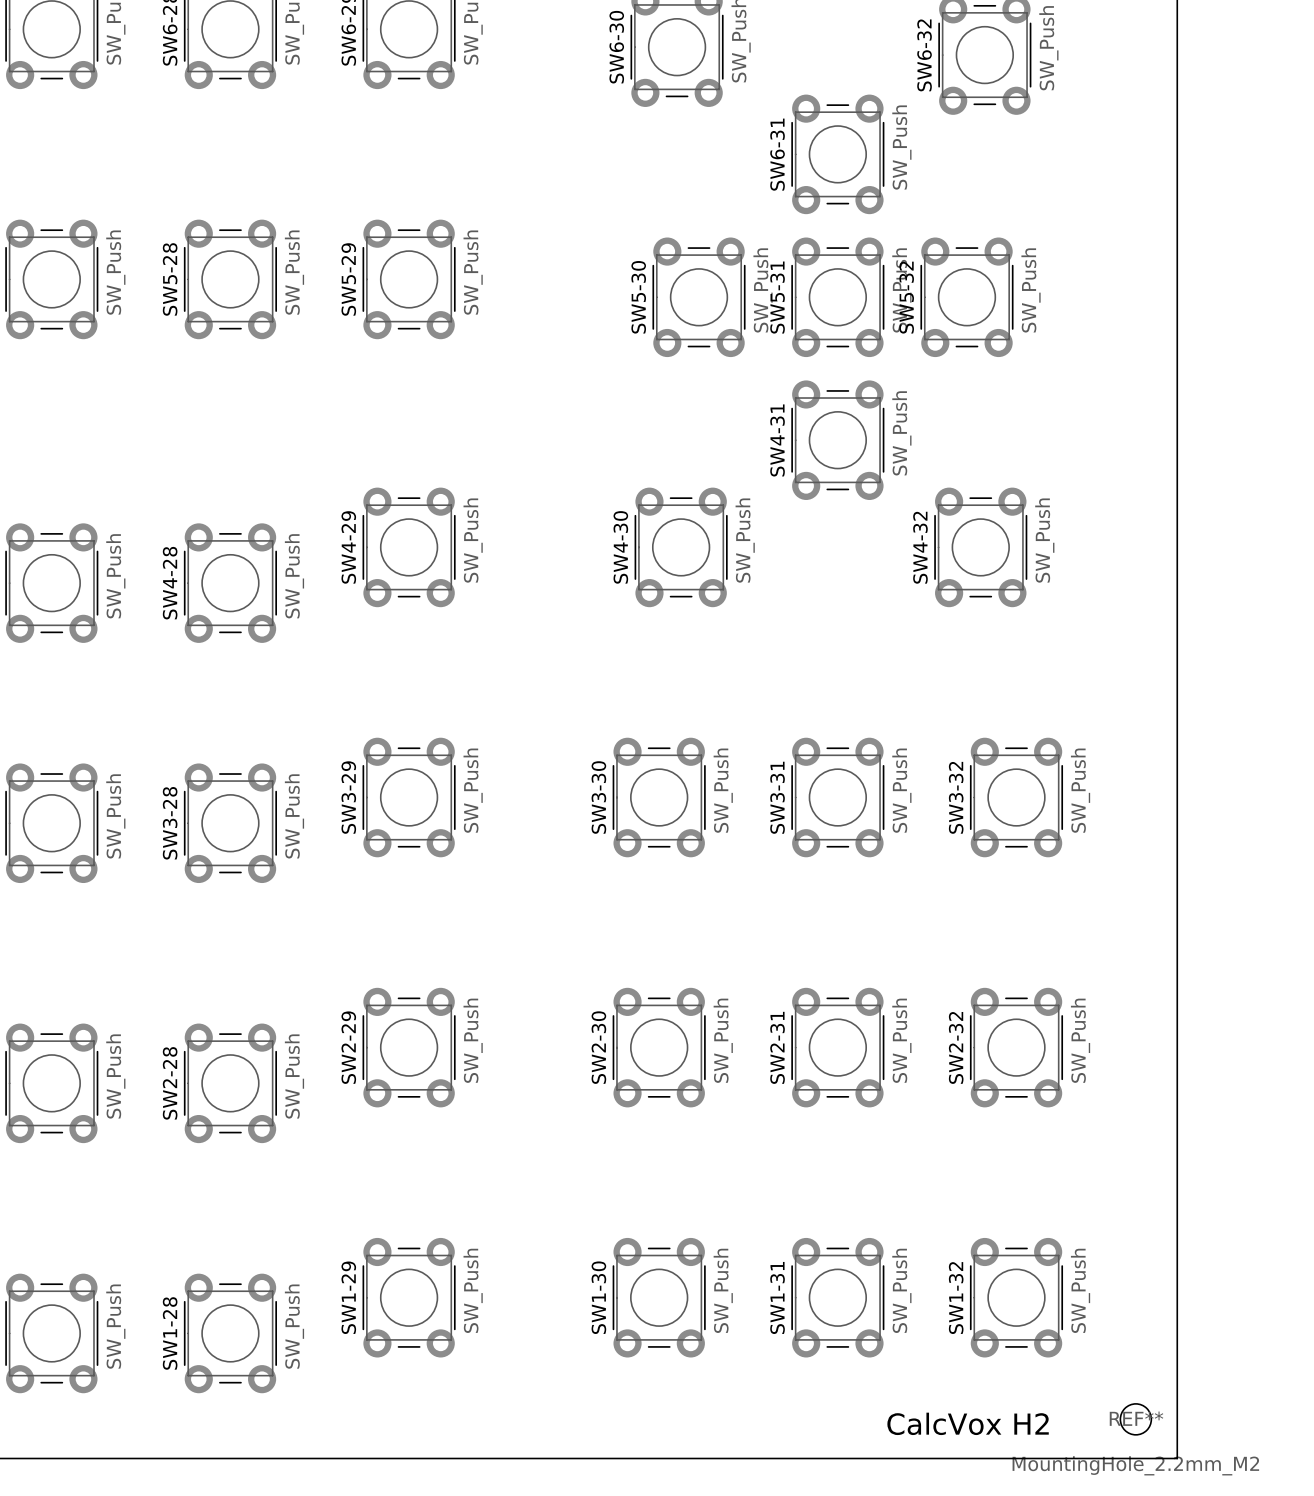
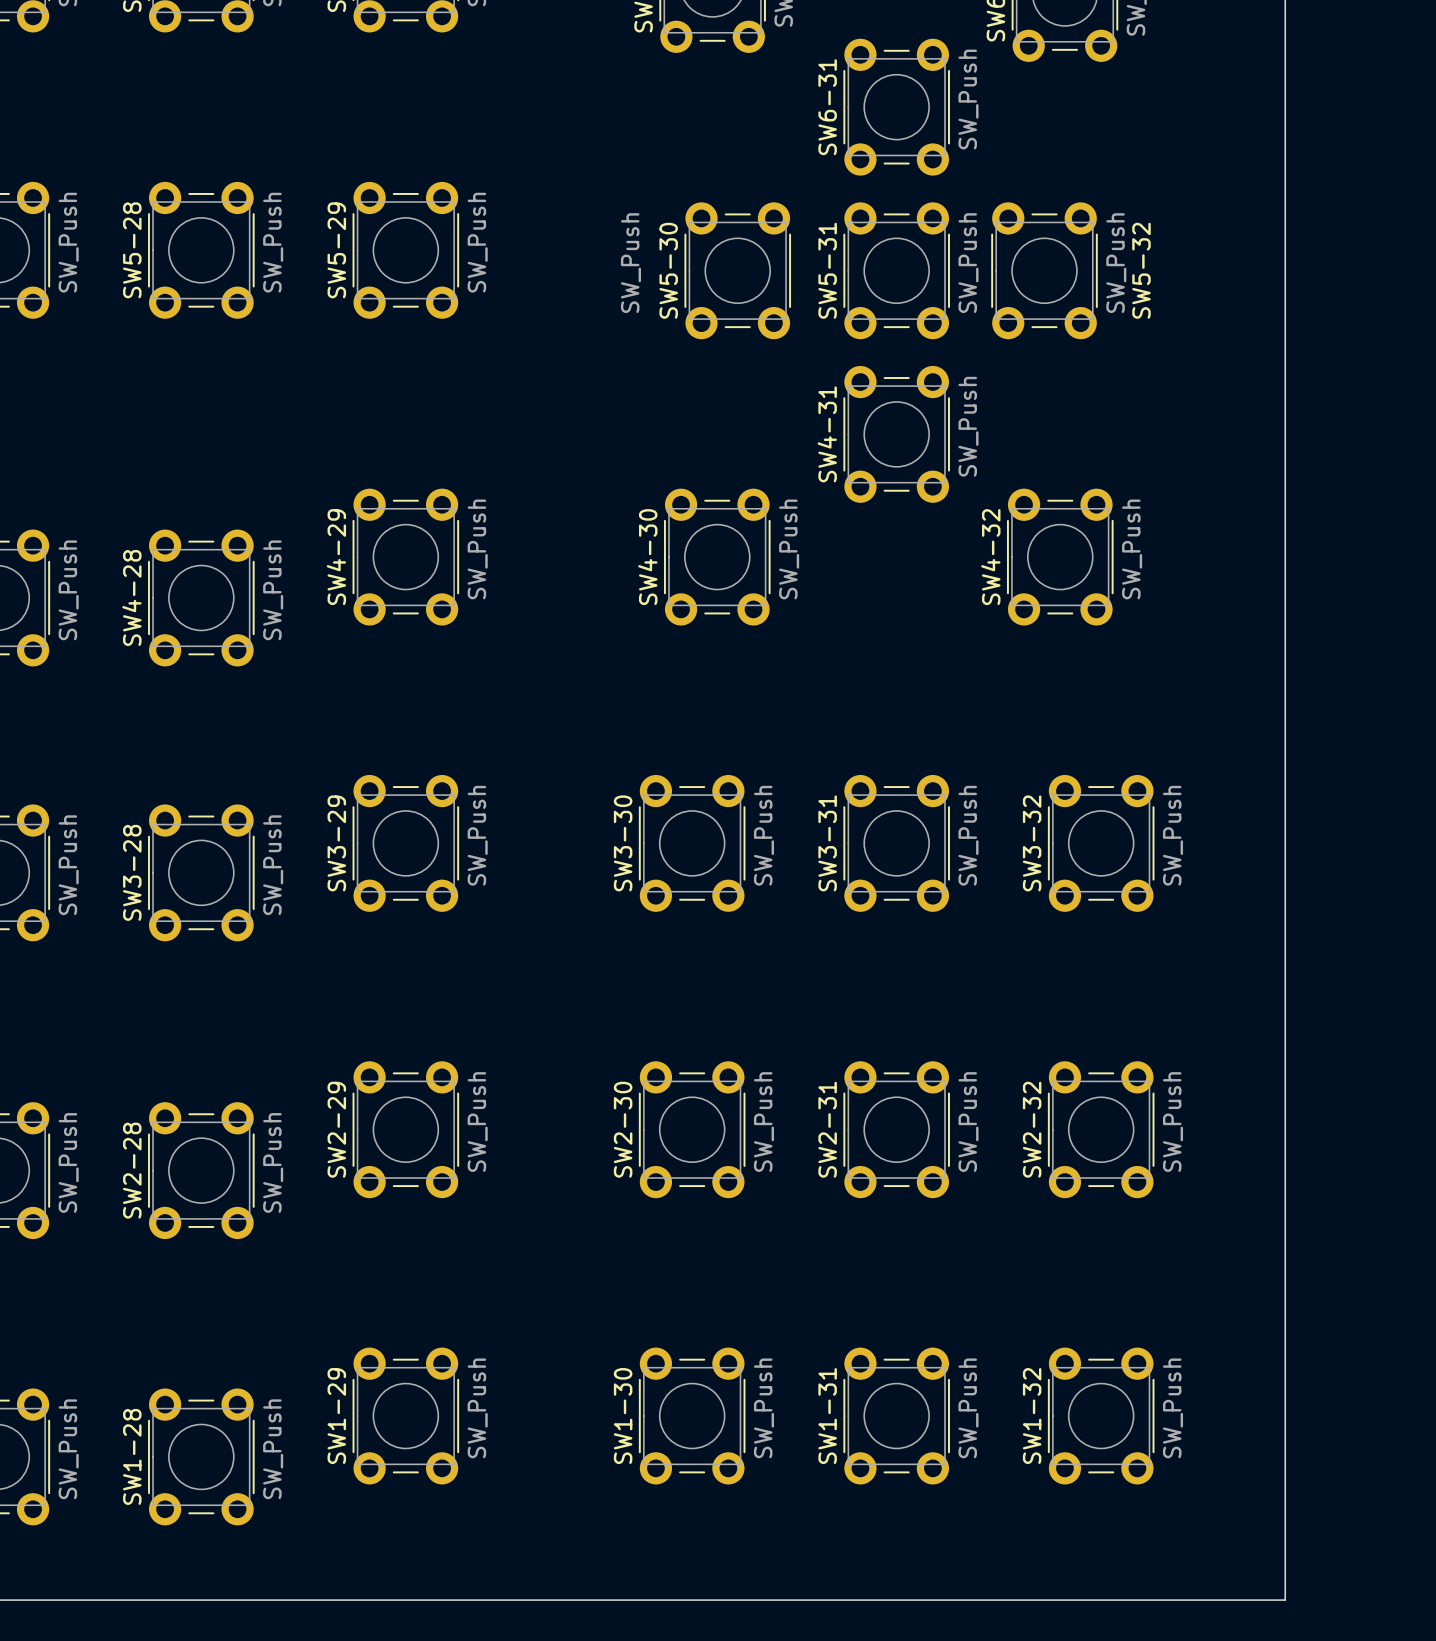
SW5-30 value position: SW_Push (763, 290) -> SW_Push (630, 263)
SW5-32 name position: SW5-32 (906, 297) -> SW5-32 (1141, 270)
REF**: MountingHole_2.2mm_M2 (1135, 1419) -> none
text: CalcVox H2 (968, 1423) -> none

